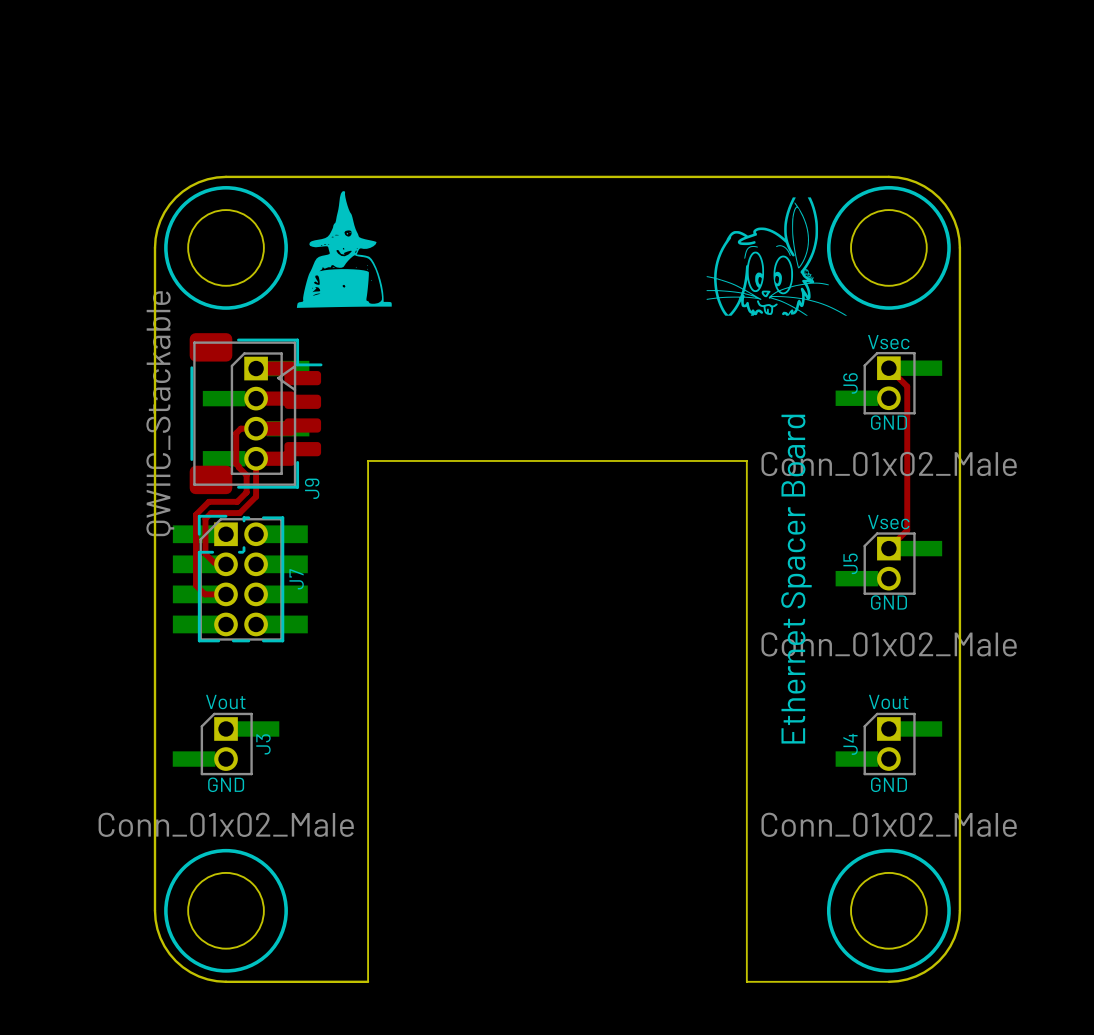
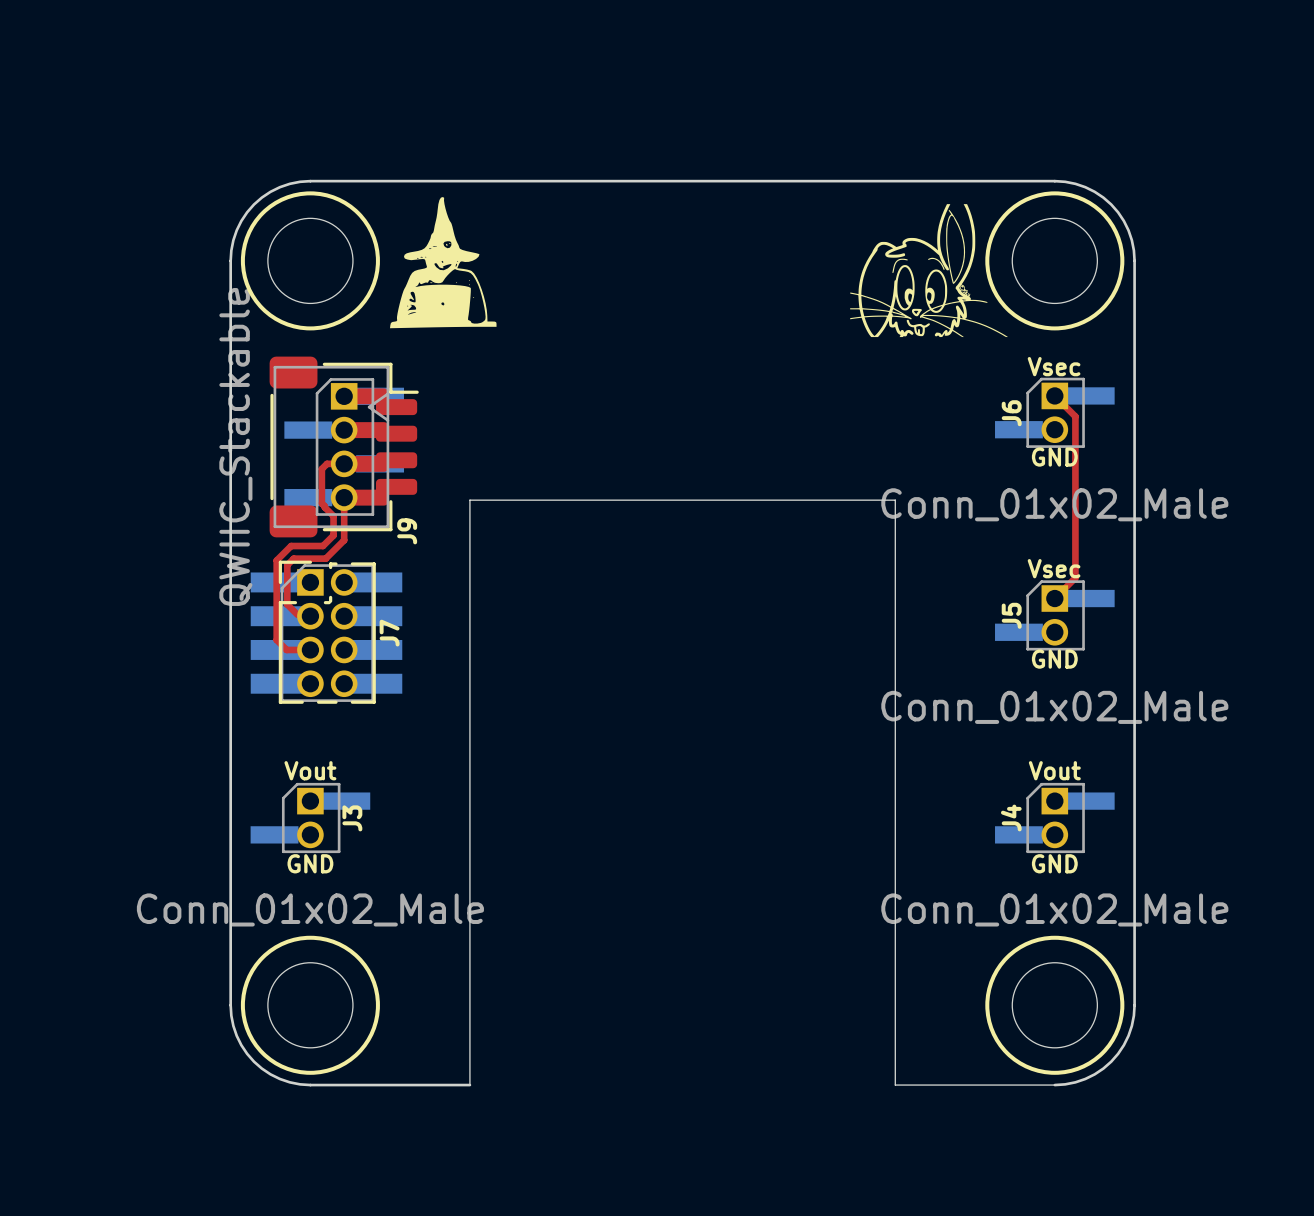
text: Ethernet Spacer Board (796, 579) -> none

